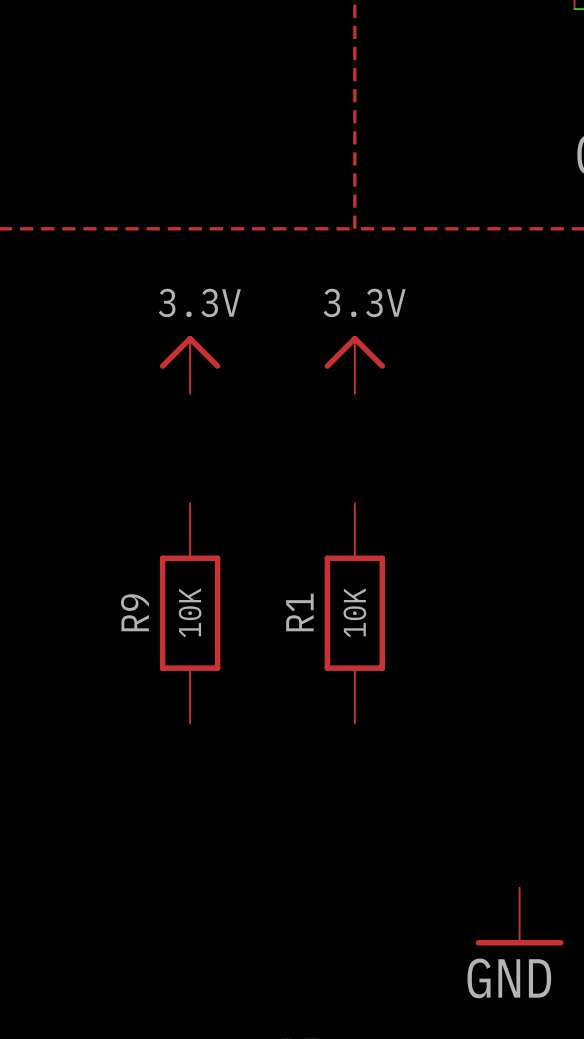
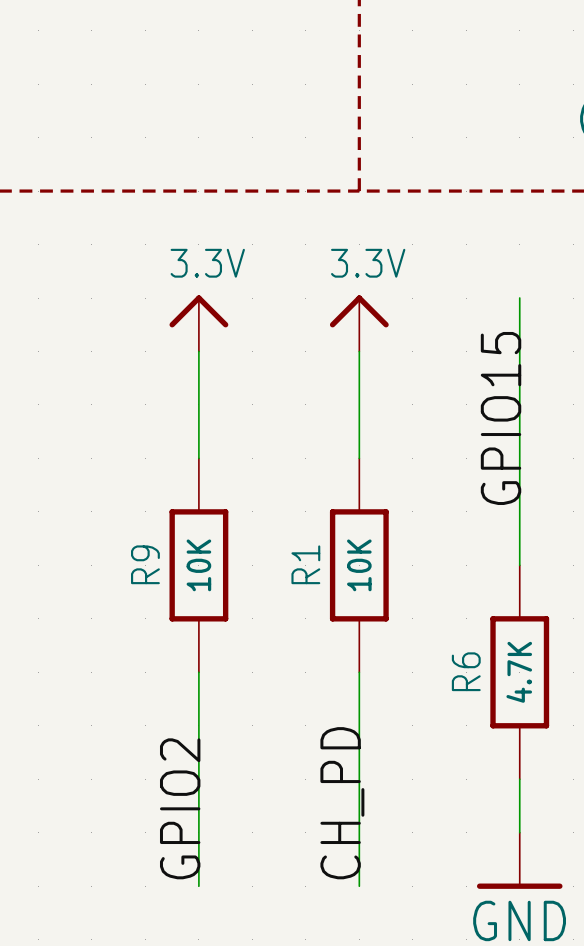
wire: none -> (519, 298) (519, 565)
wire: none -> (198, 351) (198, 458)
wire: none -> (359, 351) (359, 458)
label: none -> GPIO15 (501, 418)
wire: none -> (198, 672) (198, 886)
wire: none -> (359, 672) (359, 886)
R6: none -> 4.7K (519, 672)
wire: none -> (519, 779) (519, 832)
label: none -> GPIO2 (180, 808)
label: none -> CH_PD (342, 803)

